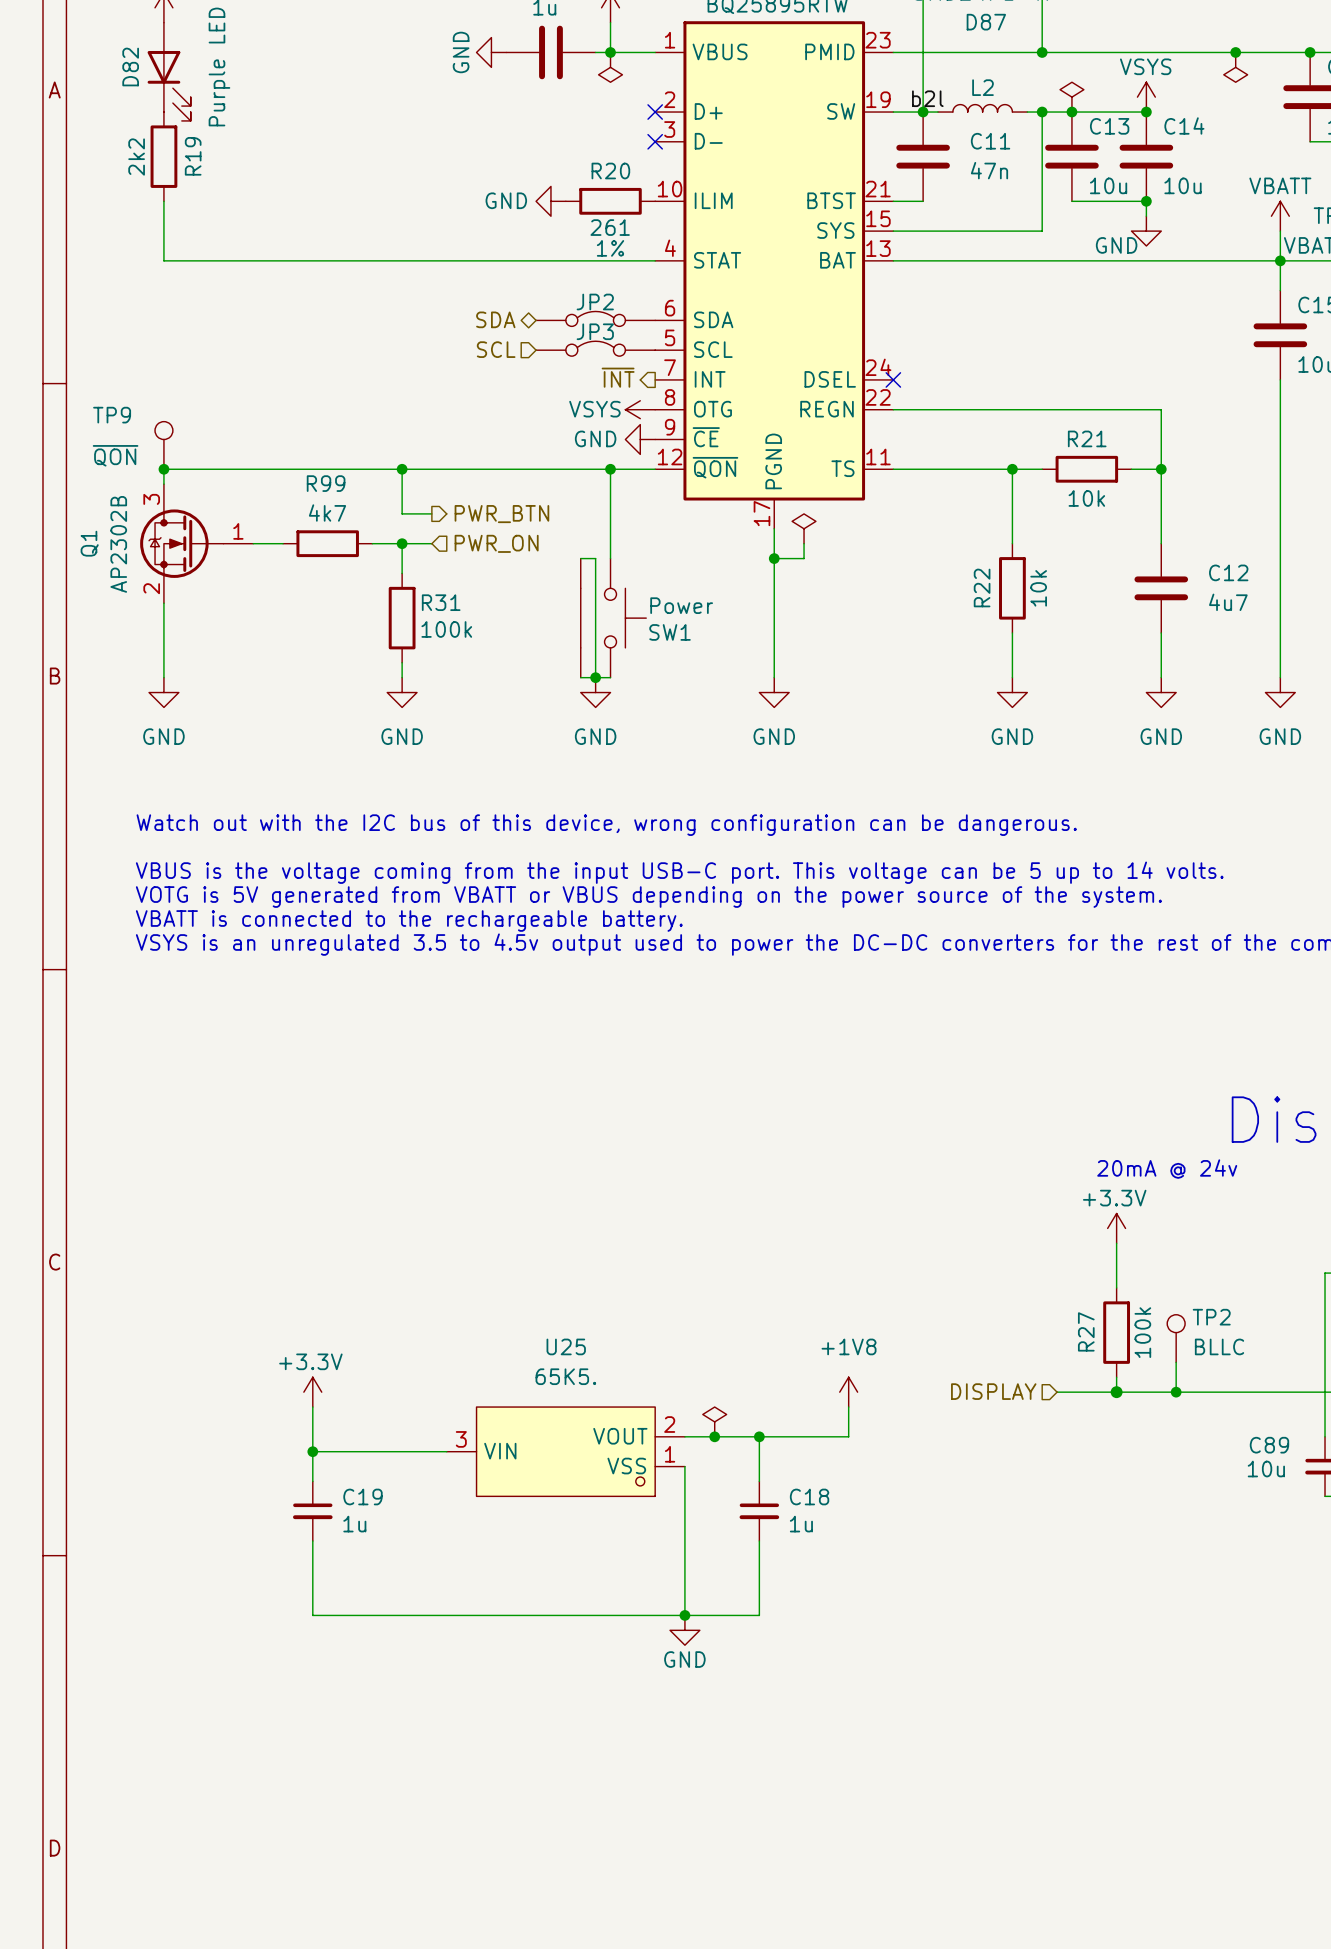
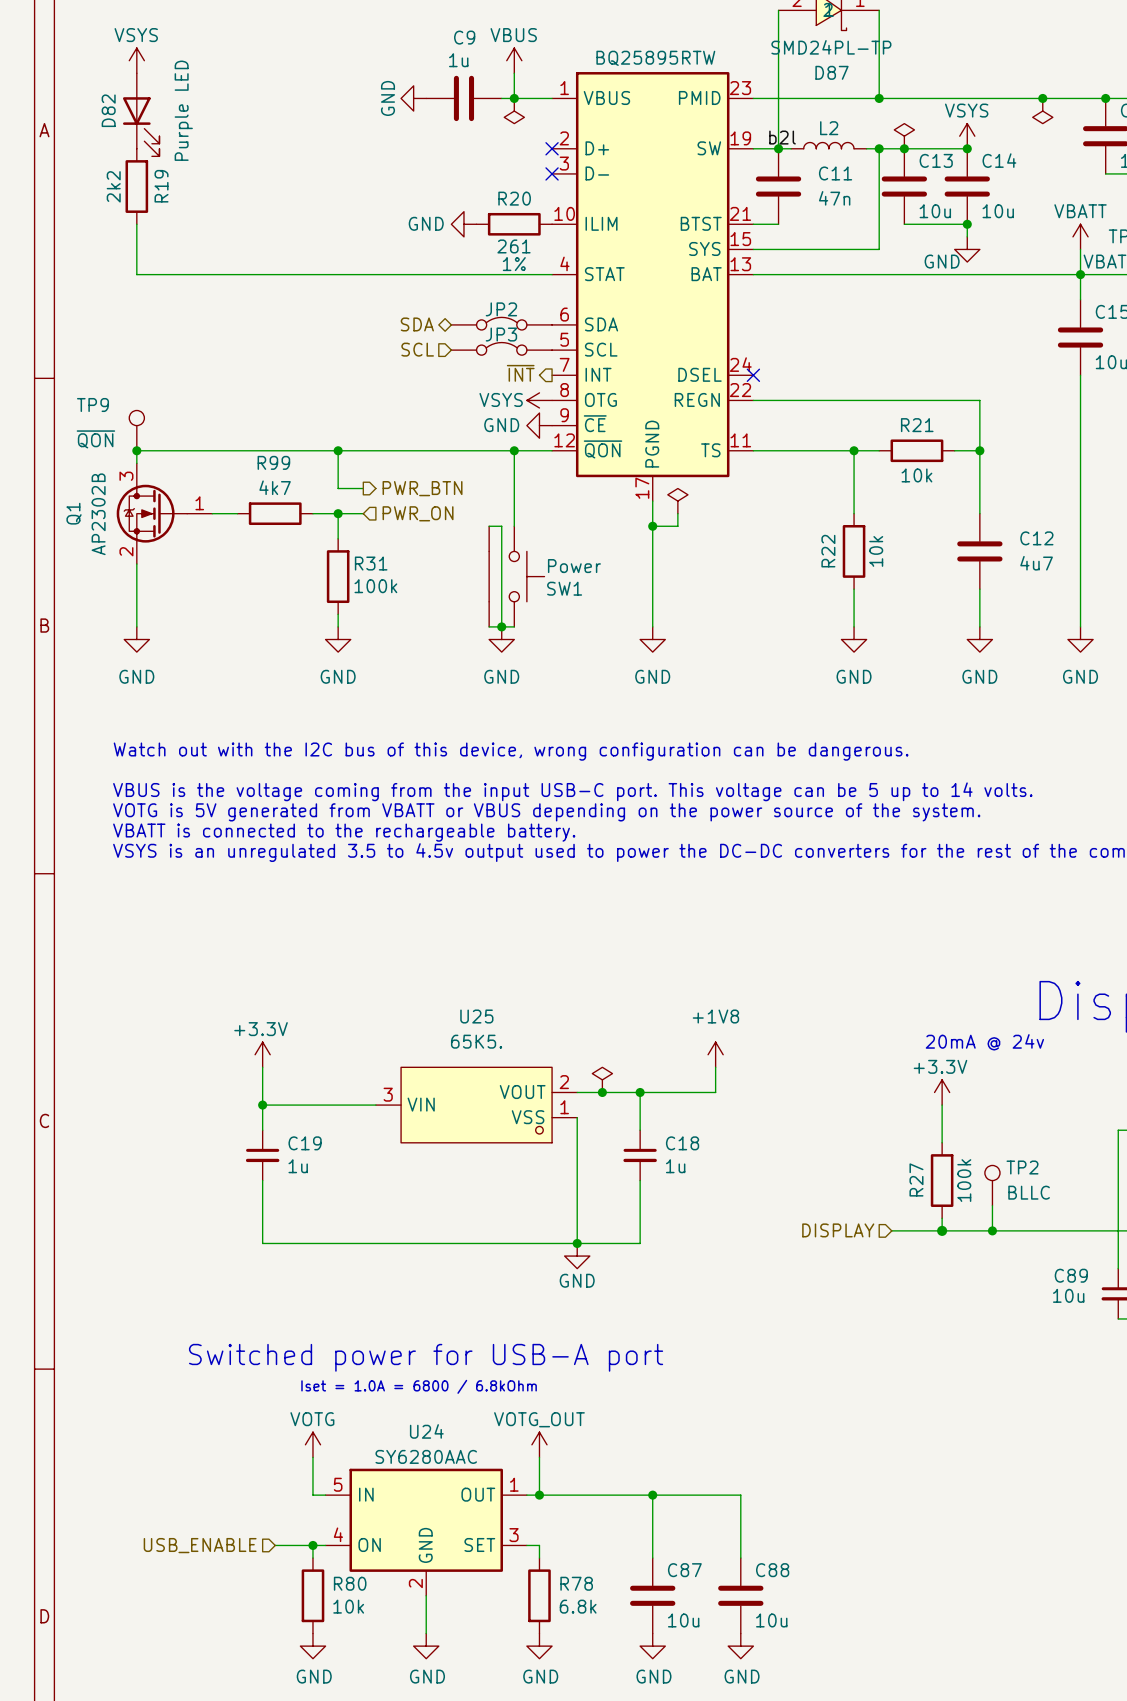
junction: none -> (602, 1092)
junction: none -> (640, 1092)
junction: none -> (262, 1105)
power symbol position: +3.3V (312, 1392) -> +3.3V (262, 1054)
power symbol position: +1V8 (848, 1392) -> +1V8 (715, 1054)
wire: (312, 1407) (312, 1481) -> (262, 1067) (262, 1130)
junction: none -> (577, 1243)
wire: (848, 1407) (848, 1436) (684, 1436) -> (715, 1067) (715, 1092) (577, 1092)
power symbol: none -> GND (577, 1256)
power symbol position: (714, 1421) -> (602, 1079)
junction: (714, 1436) -> none
wire: (759, 1436) (759, 1481) -> (640, 1092) (640, 1130)
junction: (759, 1436) -> none
wire: (312, 1451) (446, 1451) -> (262, 1105) (375, 1105)
junction: (312, 1451) -> none
U25 position: (565, 1451) -> (476, 1105)
wire: (684, 1466) (684, 1615) -> (577, 1117) (577, 1243)
C19 position: (312, 1511) -> (262, 1155)
C18 position: (759, 1511) -> (640, 1155)
wire: (312, 1541) (312, 1615) (759, 1615) (759, 1541) -> (262, 1180) (262, 1243) (640, 1243) (640, 1180)
text: none -> Switched power for USB-A port (426, 1357)
text: none -> Iset = 1.0A = 6800 / 6.8kOhm (419, 1386)
junction: (684, 1615) -> none
power symbol: GND (684, 1630) -> none
power symbol: none -> VOTG (312, 1444)
power symbol: none -> VOTG_OUT (539, 1444)
wire: none -> (312, 1457) (312, 1495) (325, 1495)
wire: none -> (539, 1457) (539, 1495)
wire: none -> (526, 1495) (740, 1495) (740, 1558)
junction: none -> (539, 1495)
wire: none -> (652, 1495) (652, 1558)
junction: none -> (652, 1495)
U24: none -> SY6280AAC (426, 1532)
hierarchical label: none -> USB_ENABLE (200, 1545)
wire: none -> (275, 1545) (325, 1545)
wire: none -> (312, 1545) (312, 1558)
junction: none -> (312, 1545)
wire: none -> (526, 1545) (539, 1545) (539, 1558)
R80: none -> 10k (312, 1595)
wire: none -> (426, 1595) (426, 1633)
R78: none -> 6.8k (539, 1595)
C87: none -> 10u (652, 1595)
C88: none -> 10u (740, 1595)
power symbol: none -> GND (312, 1646)
power symbol: none -> GND (426, 1646)
power symbol: none -> GND (539, 1646)
power symbol: none -> GND (652, 1646)
power symbol: none -> GND (740, 1646)

